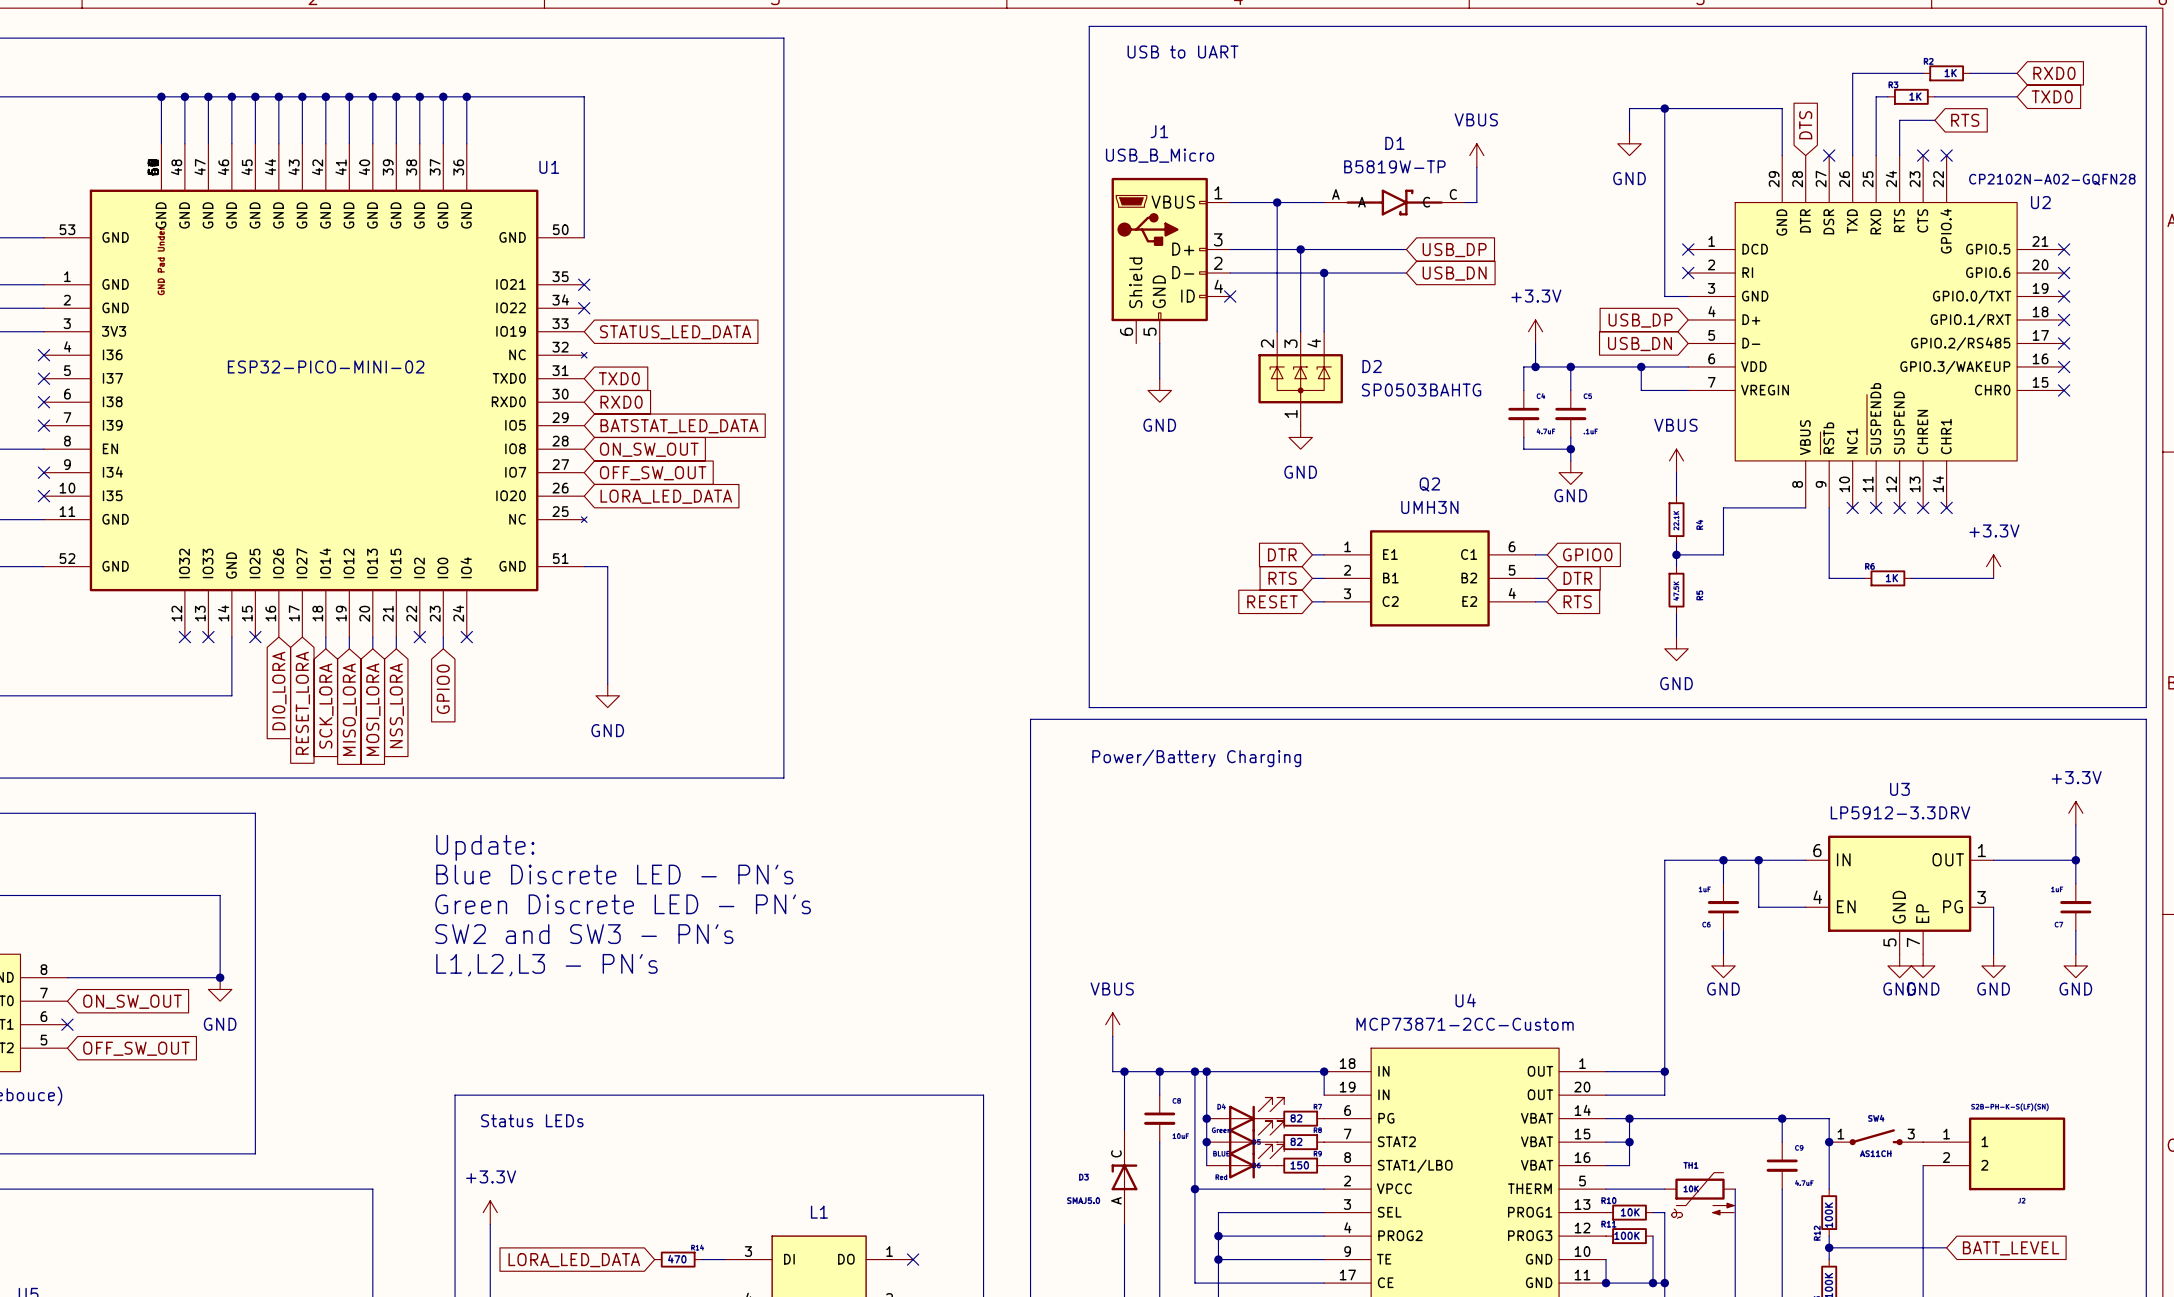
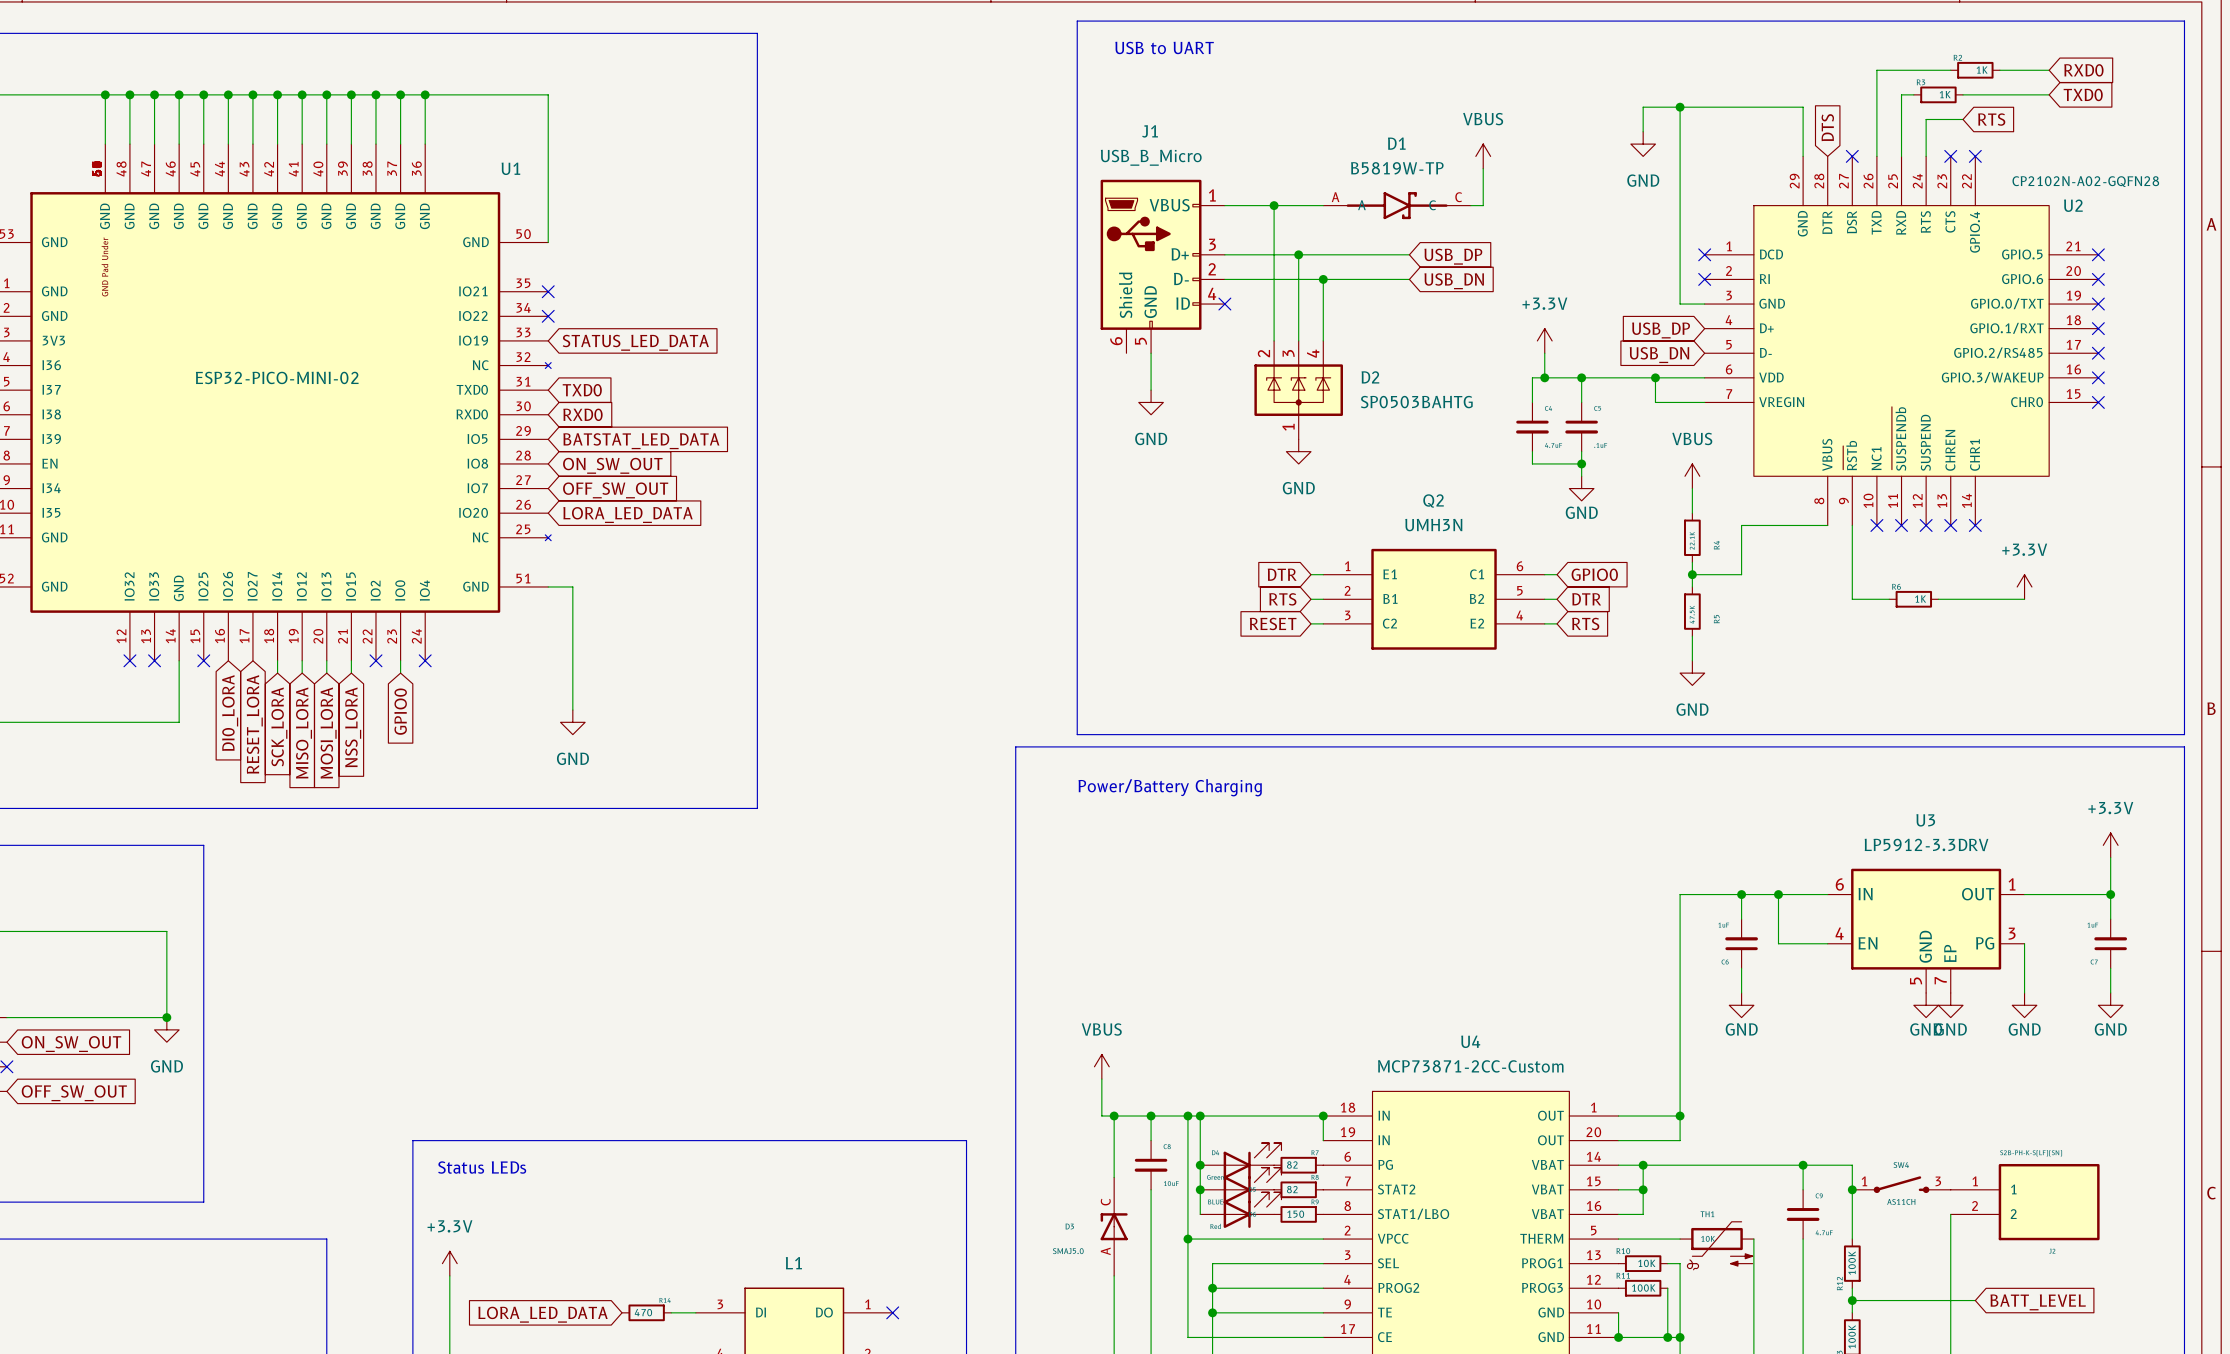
text: Update: (485, 847) -> none
text: Blue Discrete LED - PN's (614, 874) -> none
text: Green Discrete LED - PN's (623, 904) -> none
text: SW2 and SW3 - PN's (584, 934) -> none
text: L1,L2,L3 - PN's (546, 965) -> none

